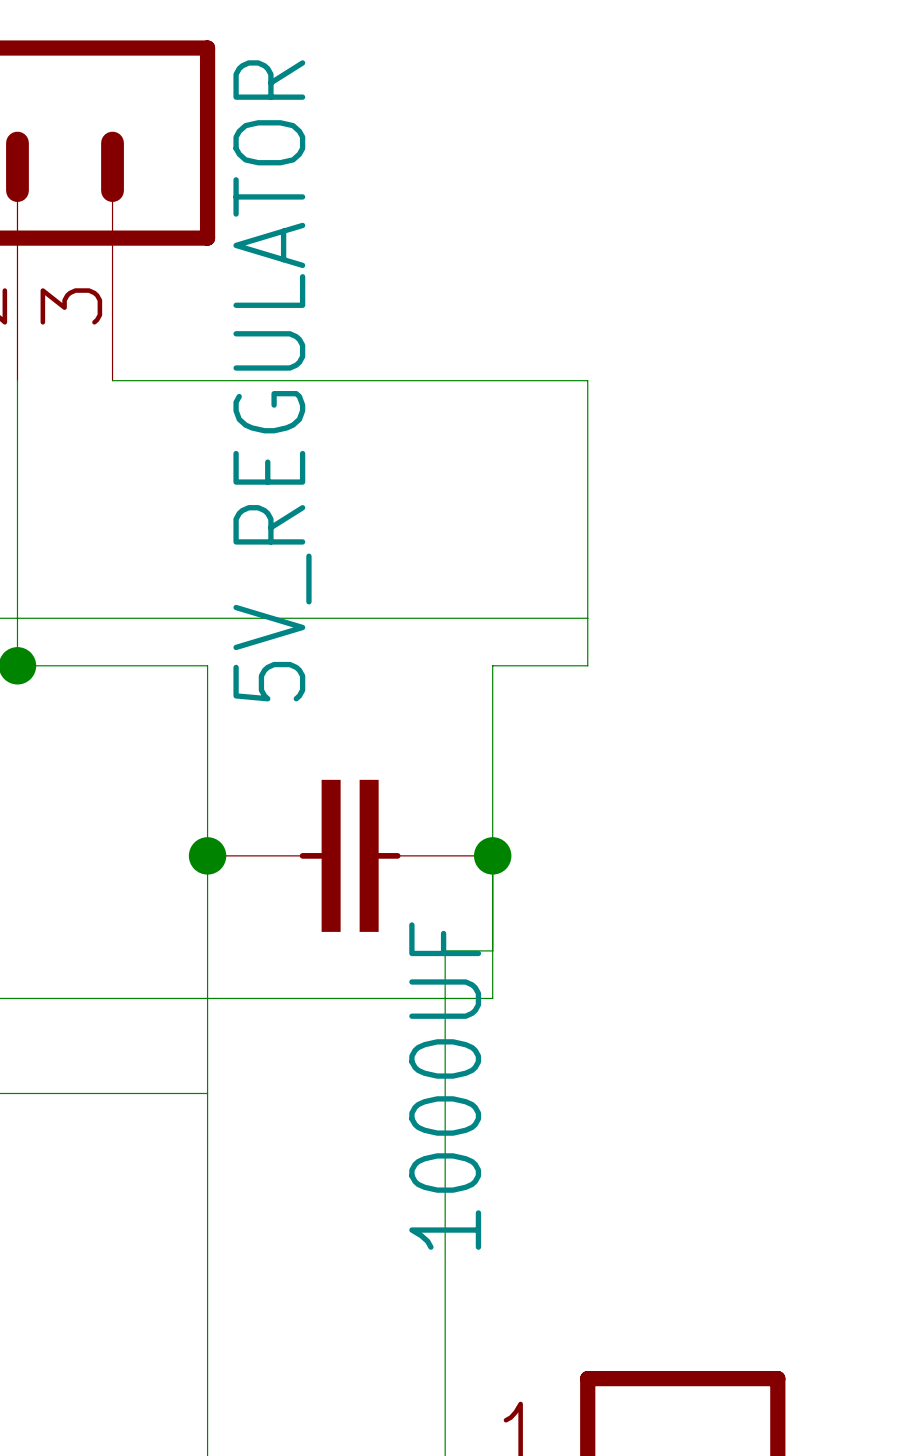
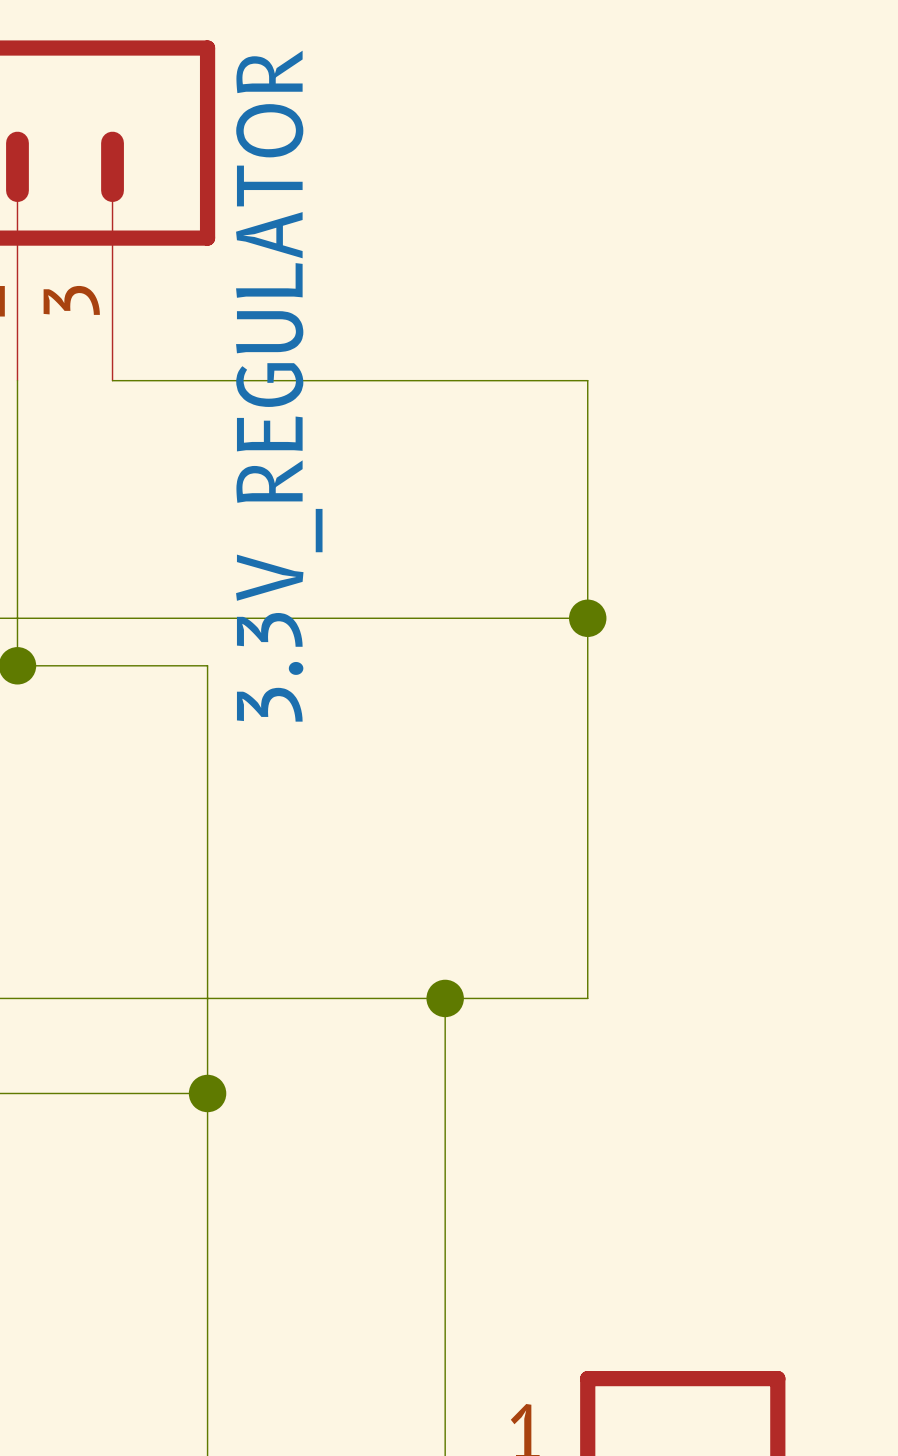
5V_REGULATOR name: 5V_REGULATOR (272, 380) -> 3.3V_REGULATOR (279, 386)
junction: none -> (587, 618)
wire: (587, 665) (492, 665) (492, 998) -> (587, 665) (587, 998) (492, 998)
junction: (207, 855) -> none
1000UF: (350, 855) -> none
junction: (492, 855) -> none
wire: (492, 950) (445, 950) (445, 998) -> none
junction: none -> (445, 998)
junction: none -> (207, 1093)

